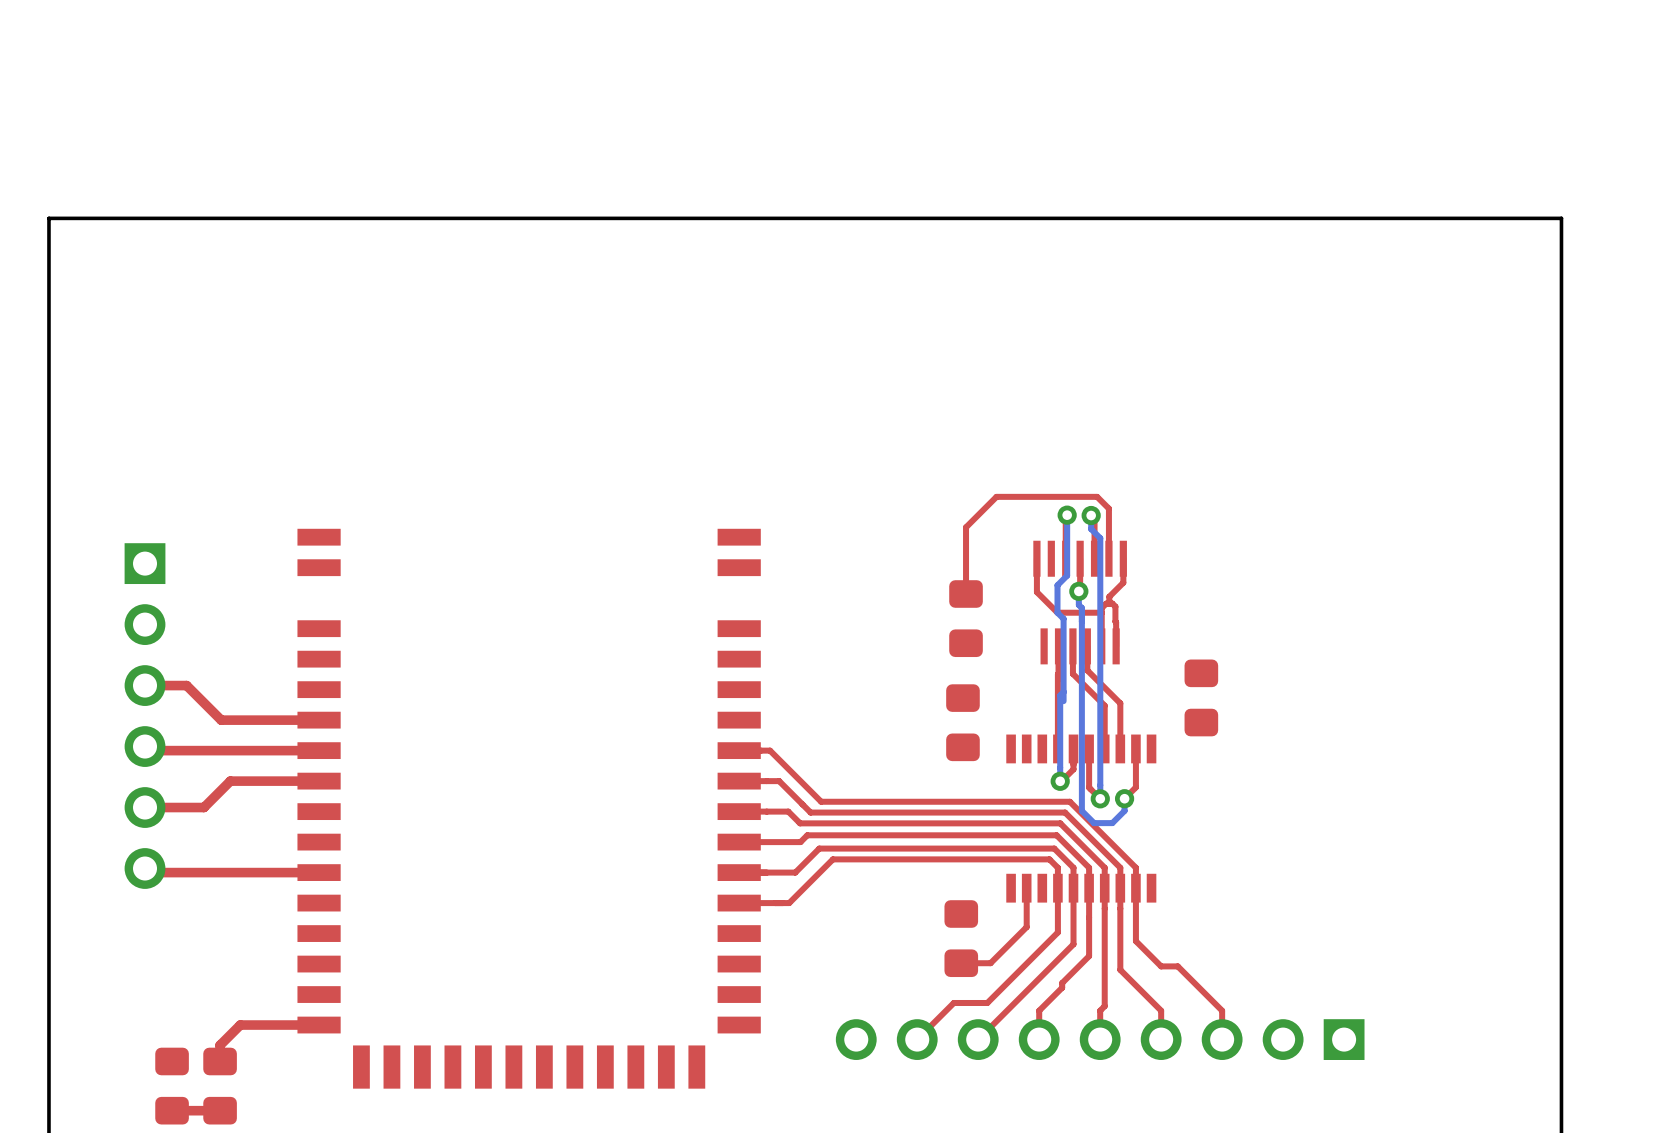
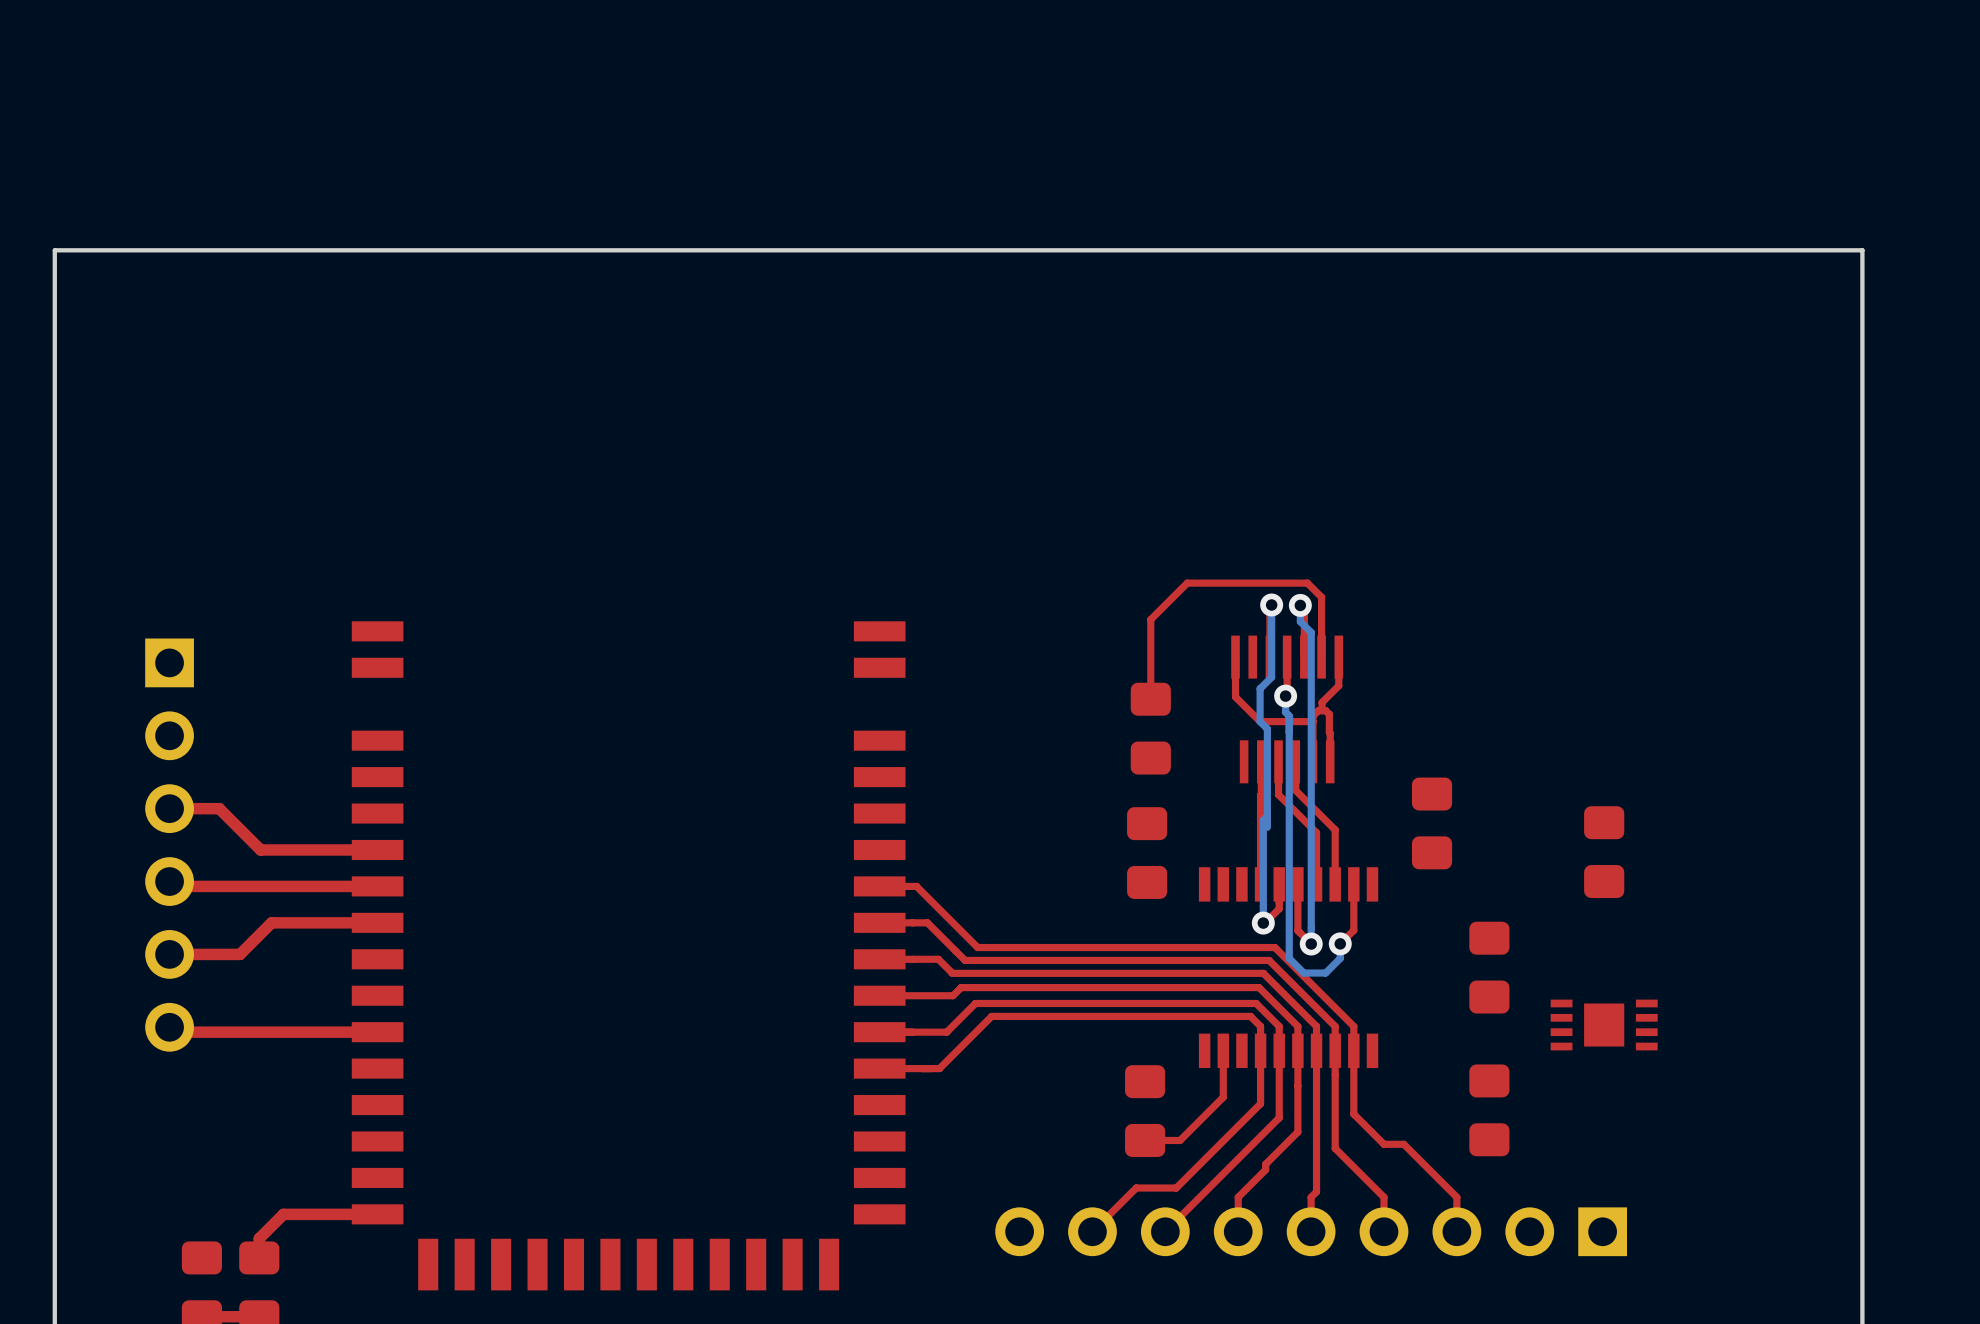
part: none -> (1604, 852)
part: none -> (1489, 967)
part: none -> (1604, 1024)
part: none -> (1489, 1110)

